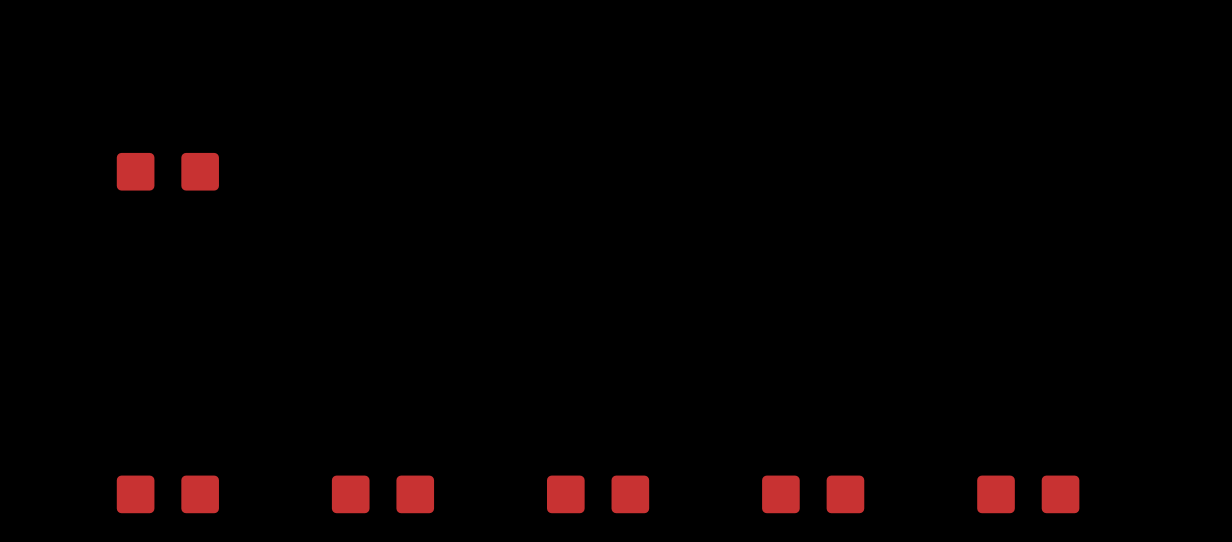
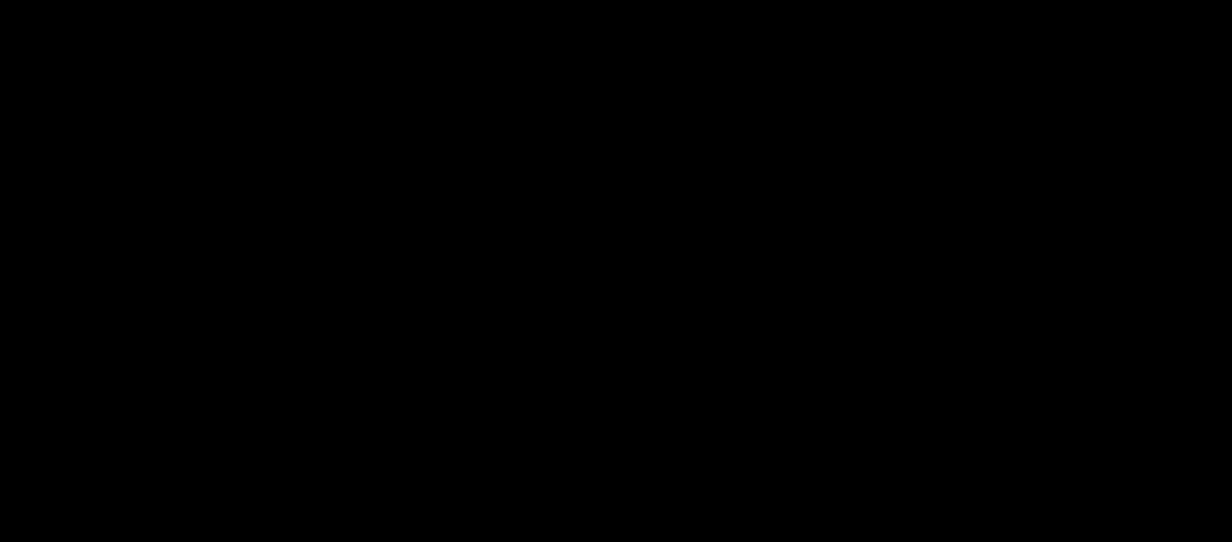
part: (167, 171) -> none
part: (167, 494) -> none
part: (382, 494) -> none
part: (598, 494) -> none
part: (813, 494) -> none
part: (1028, 494) -> none

